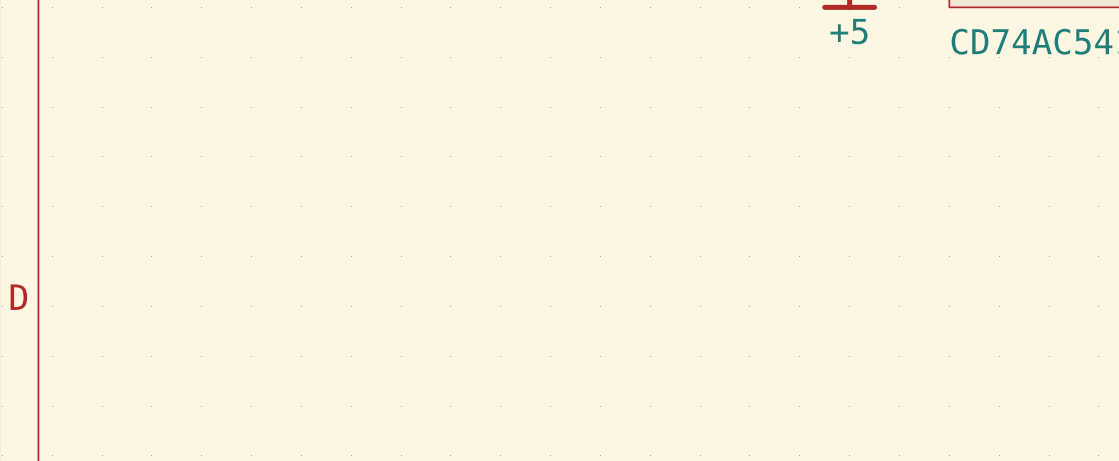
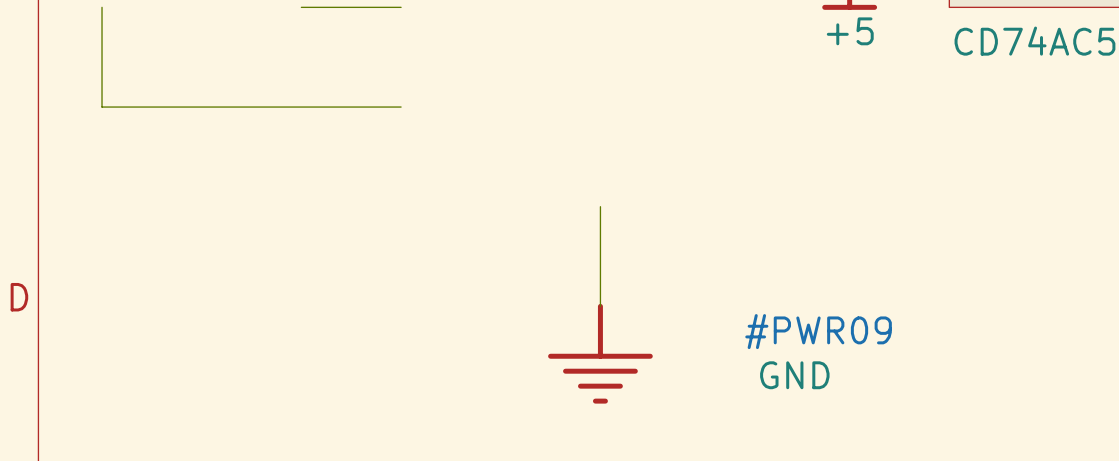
wire: none -> (102, 7) (102, 107) (401, 107)
wire: none -> (301, 7) (401, 7)
wire: none -> (600, 206) (600, 306)
#PWR09: none -> GND (600, 353)

